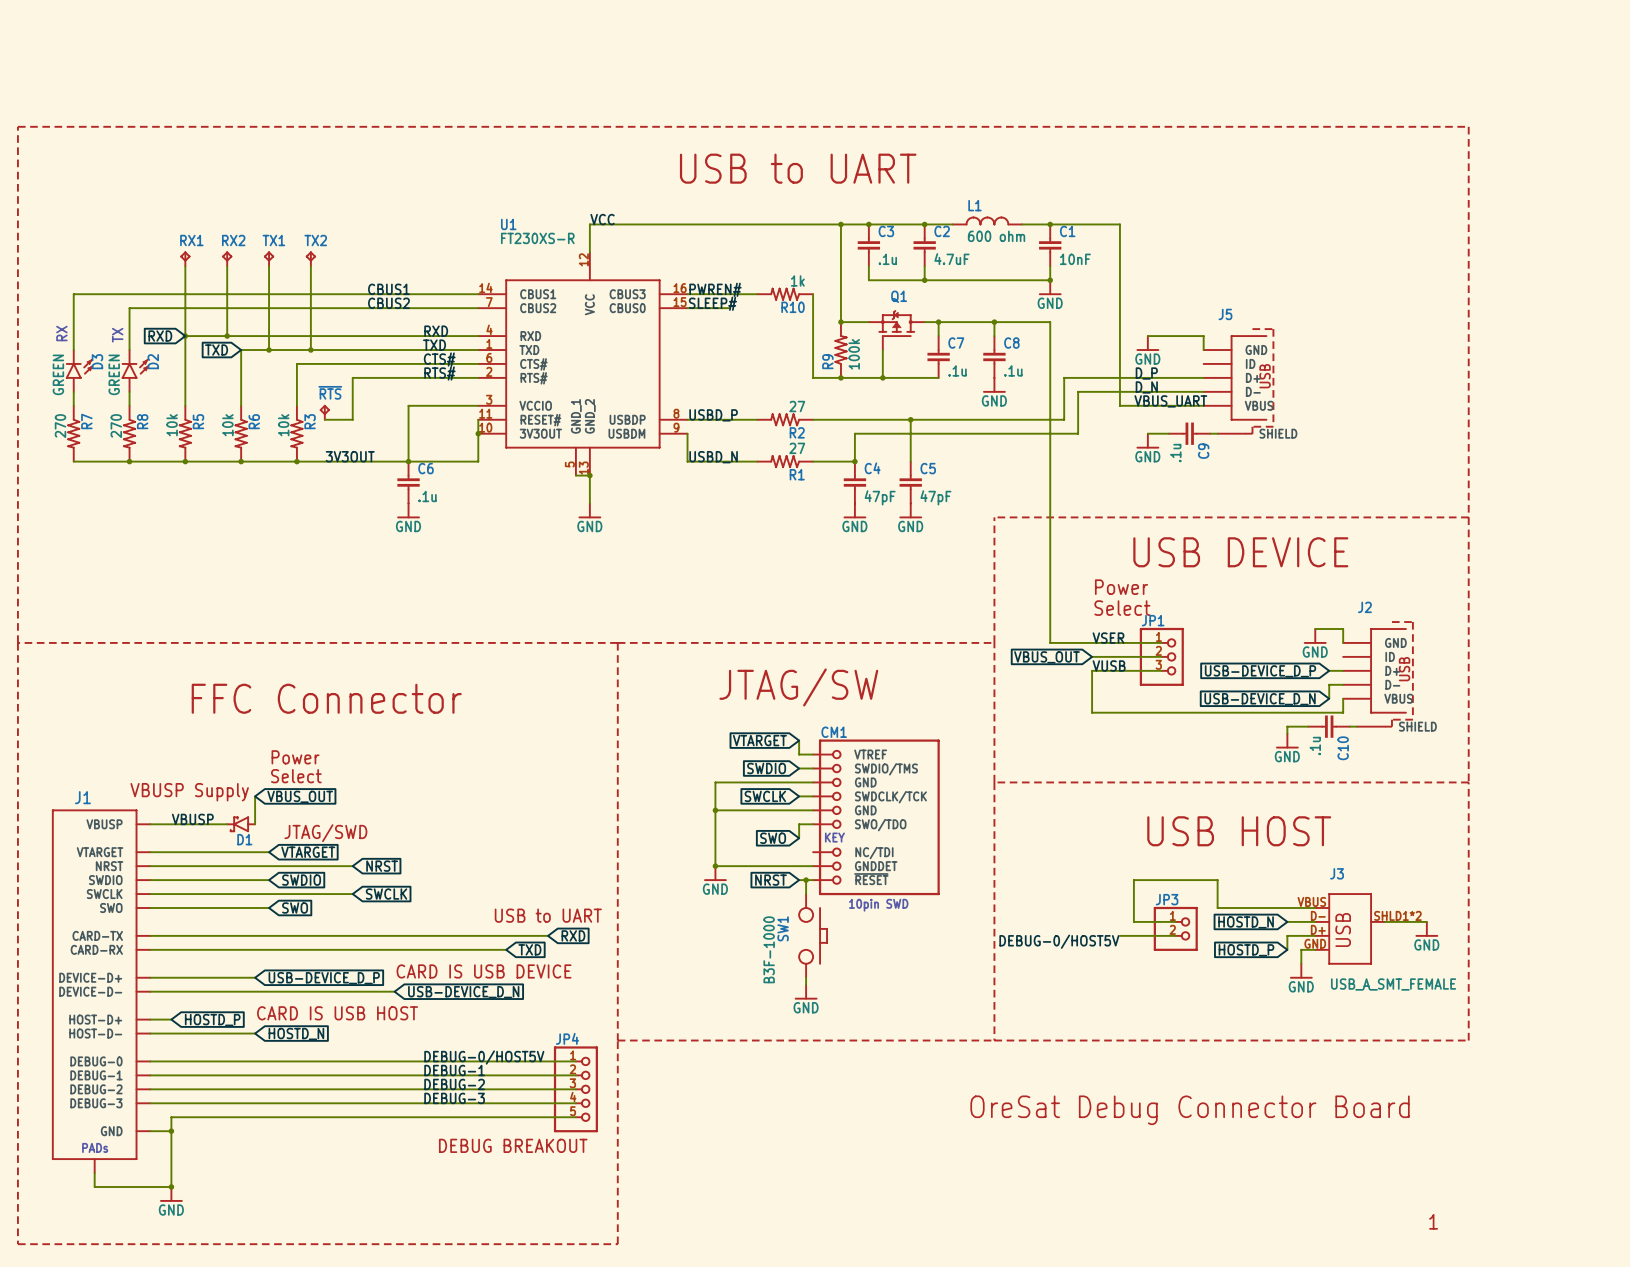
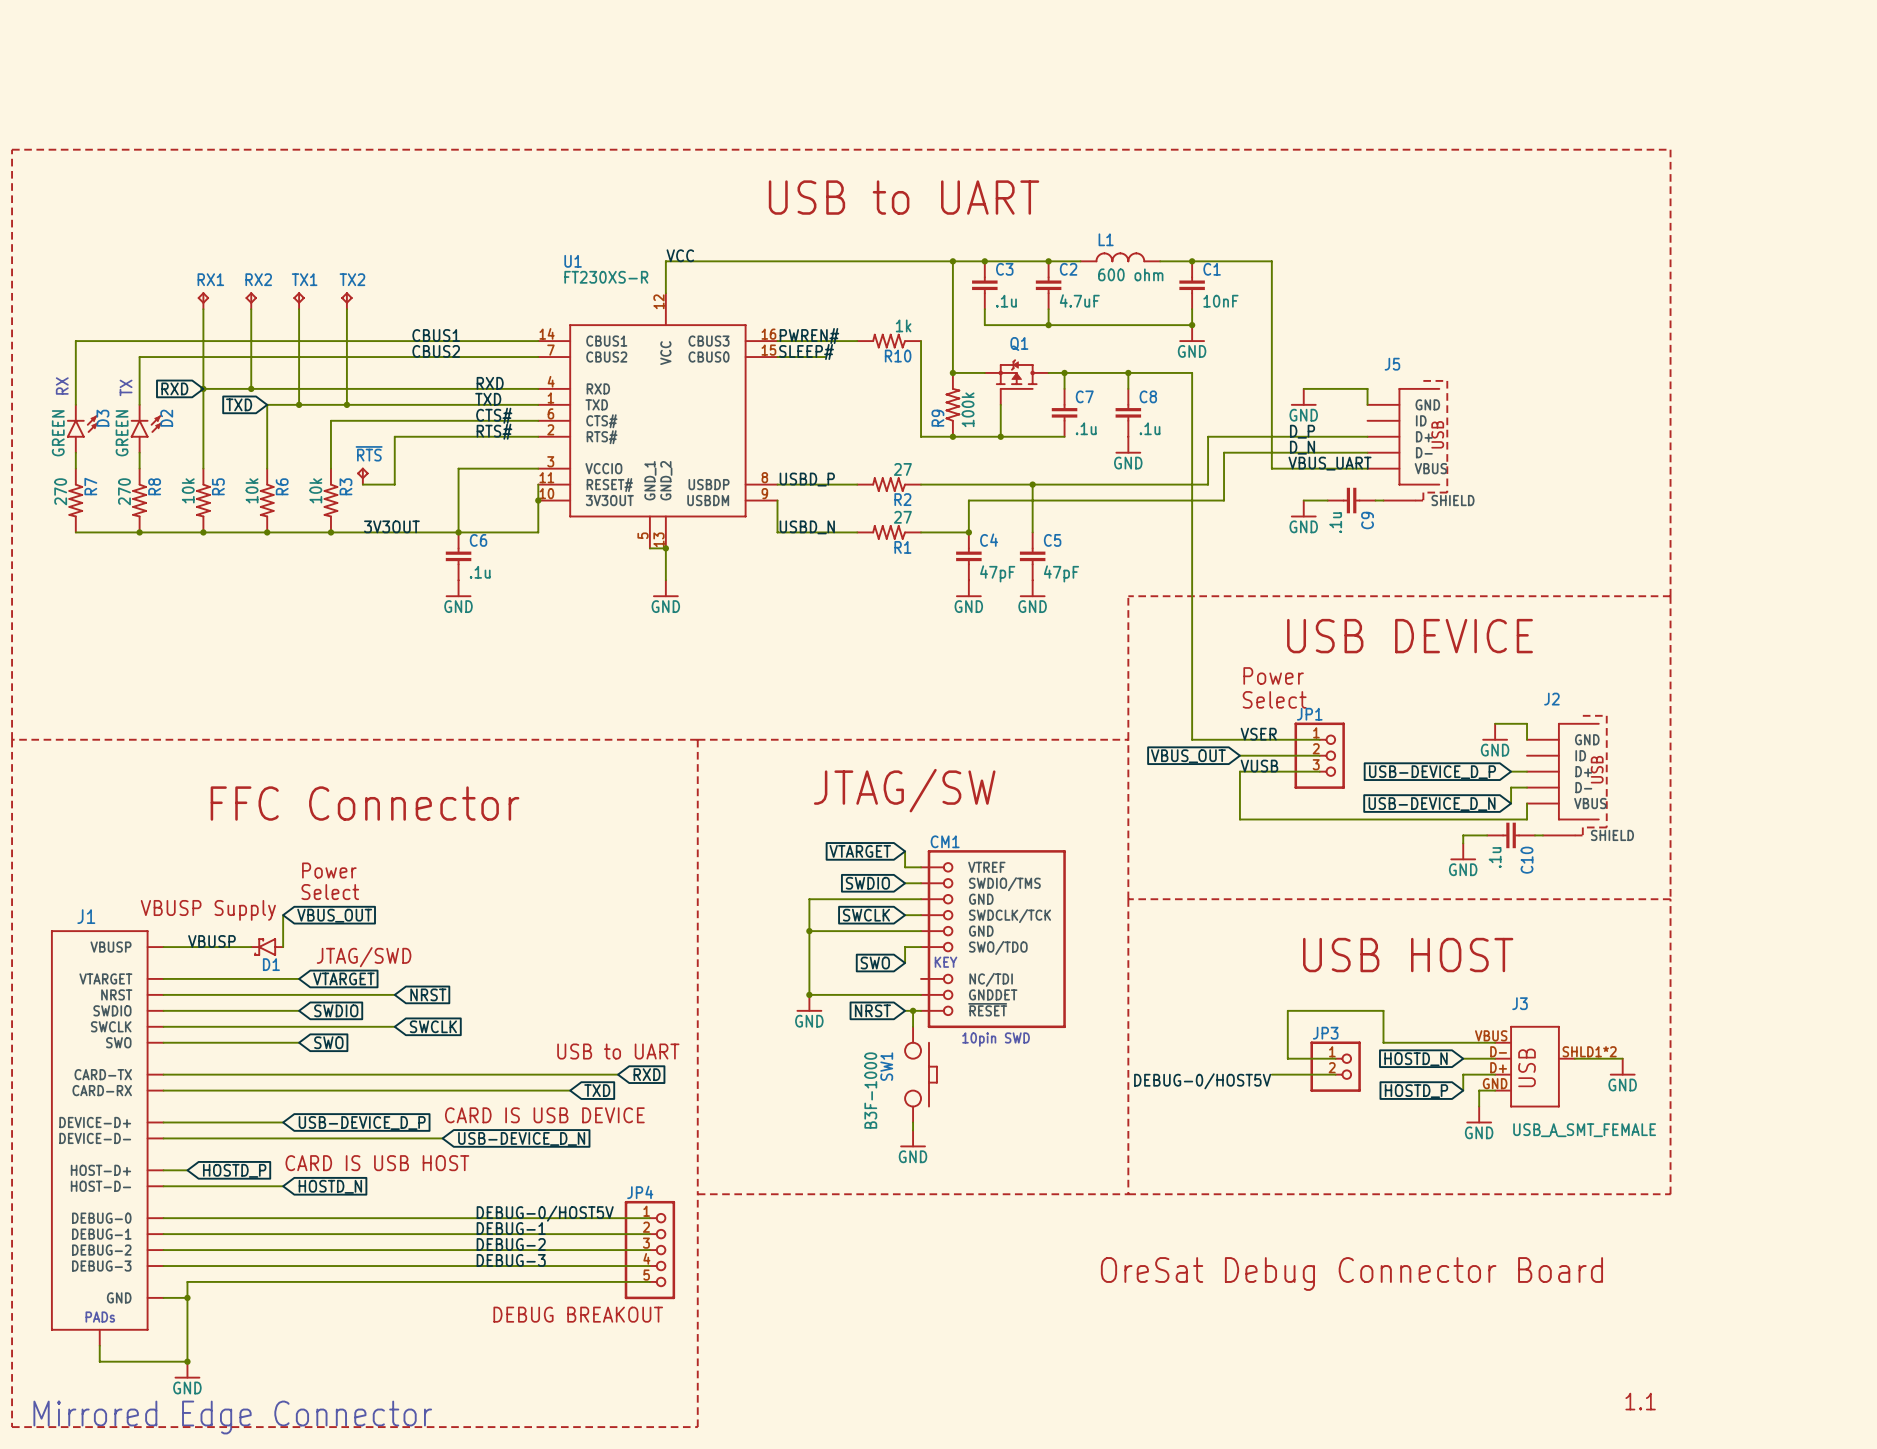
text: 1 (1433, 1221) -> 1.1 (1640, 1401)
text: none -> Mirrored Edge Connector (232, 1417)

